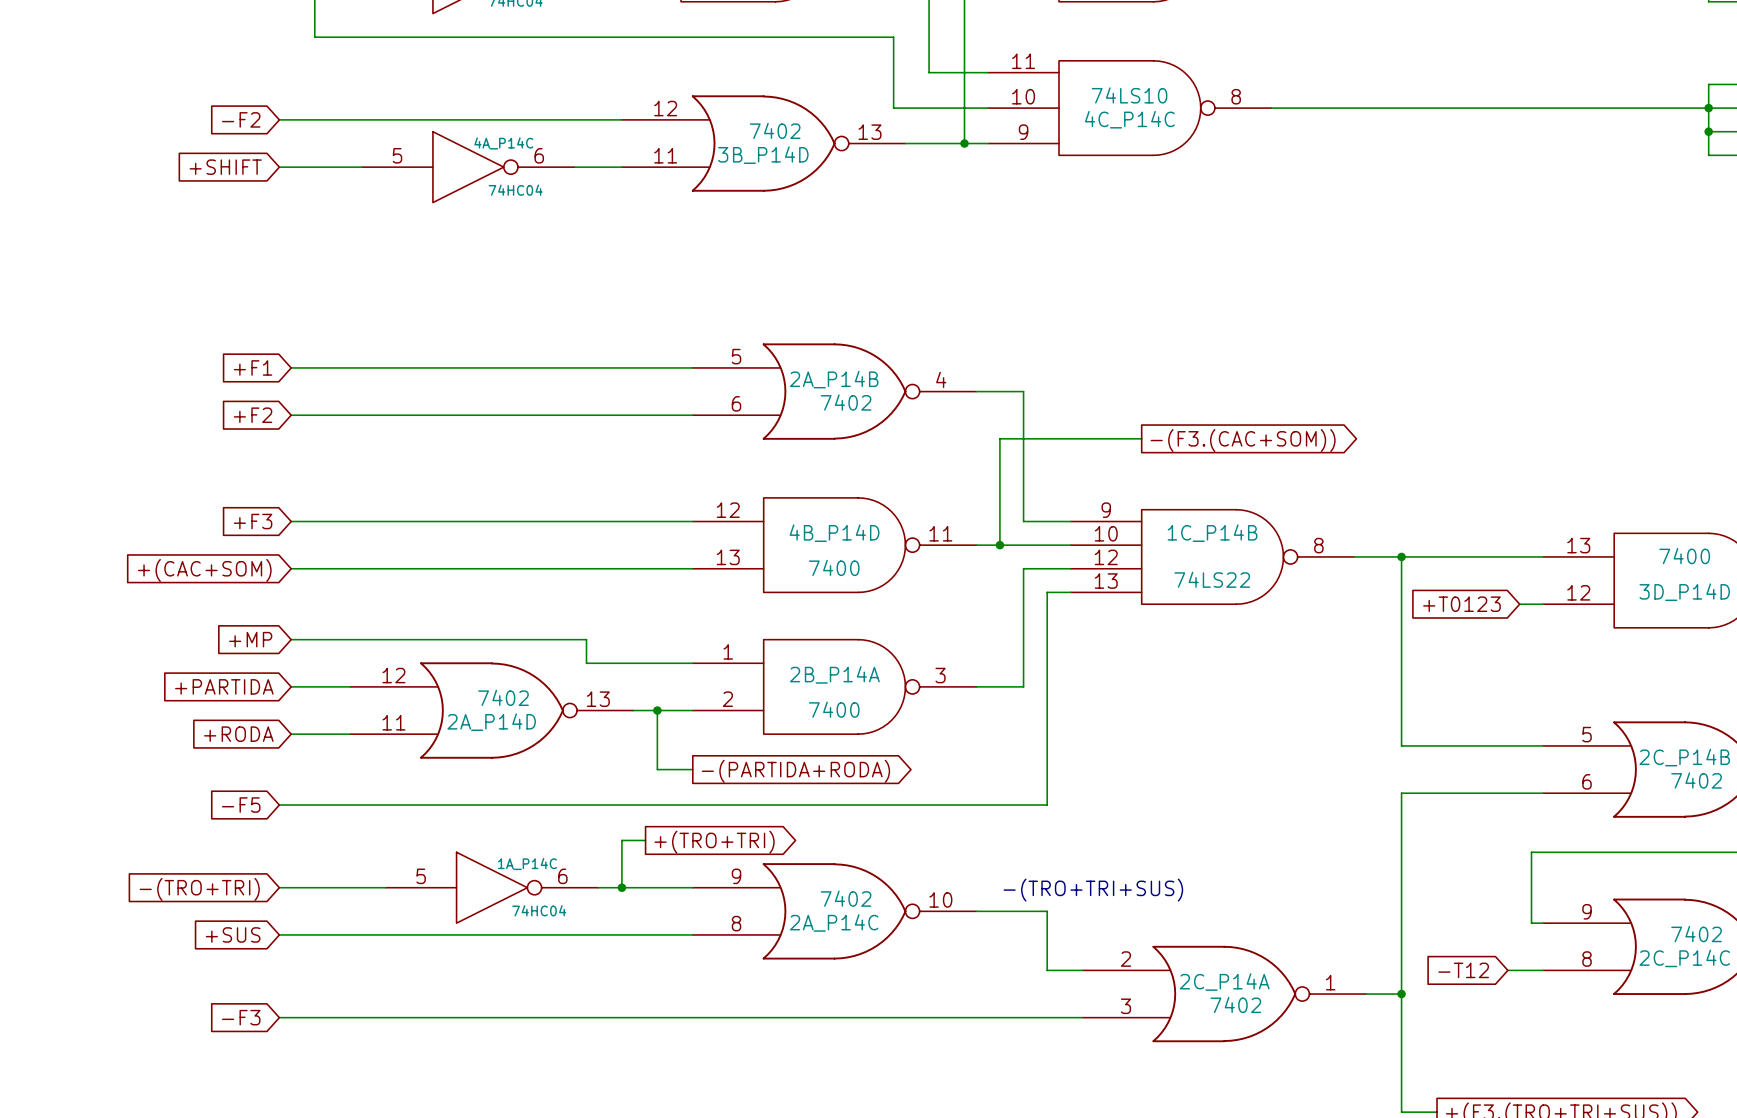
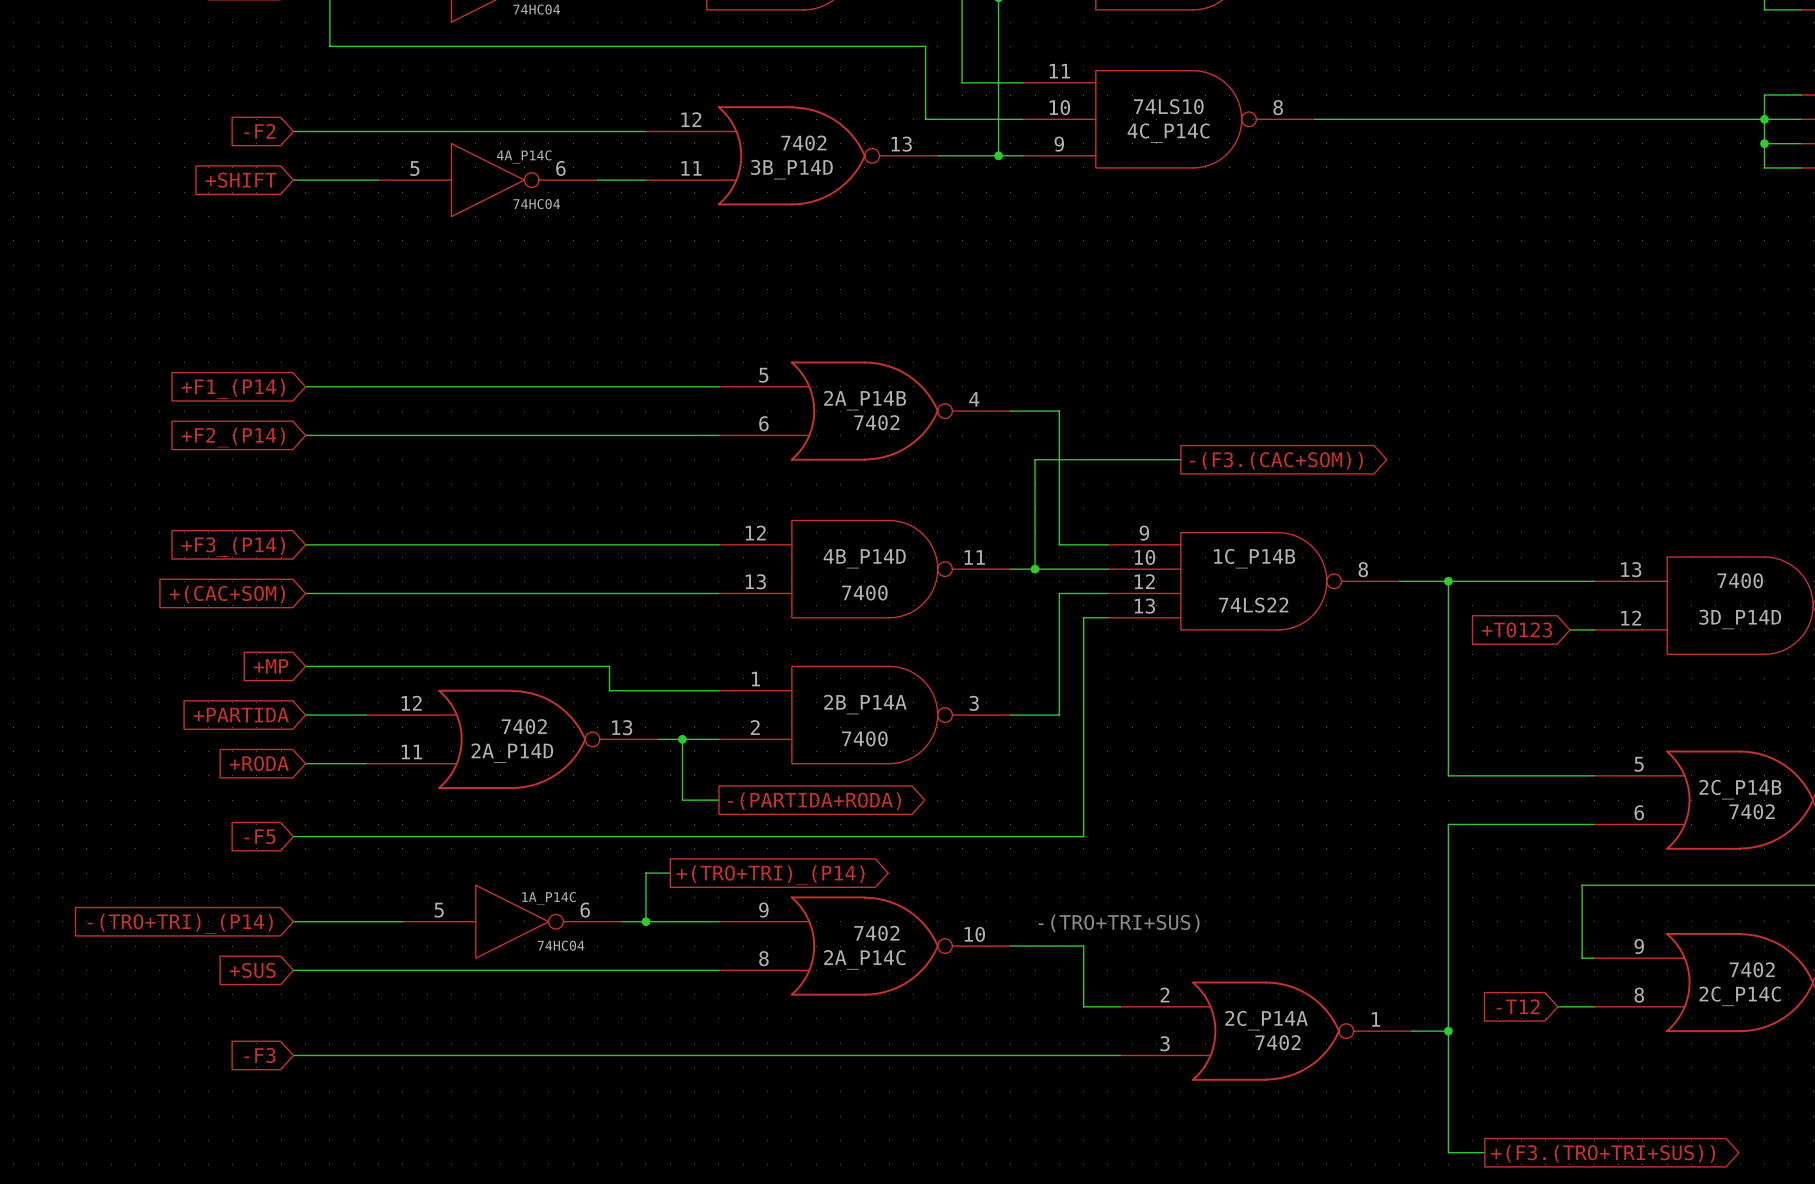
global label: +F1 (253, 367) -> +F1_(P14) (233, 388)
global label: +F2 (253, 415) -> +F2_(P14) (233, 437)
global label: +F3 (253, 521) -> +F3_(P14) (233, 546)
global label: +(TRO+TRI) (714, 842) -> +(TRO+TRI)_(P14) (770, 875)
global label: -(TRO+TRI) (199, 889) -> -(TRO+TRI)_(P14) (180, 923)

